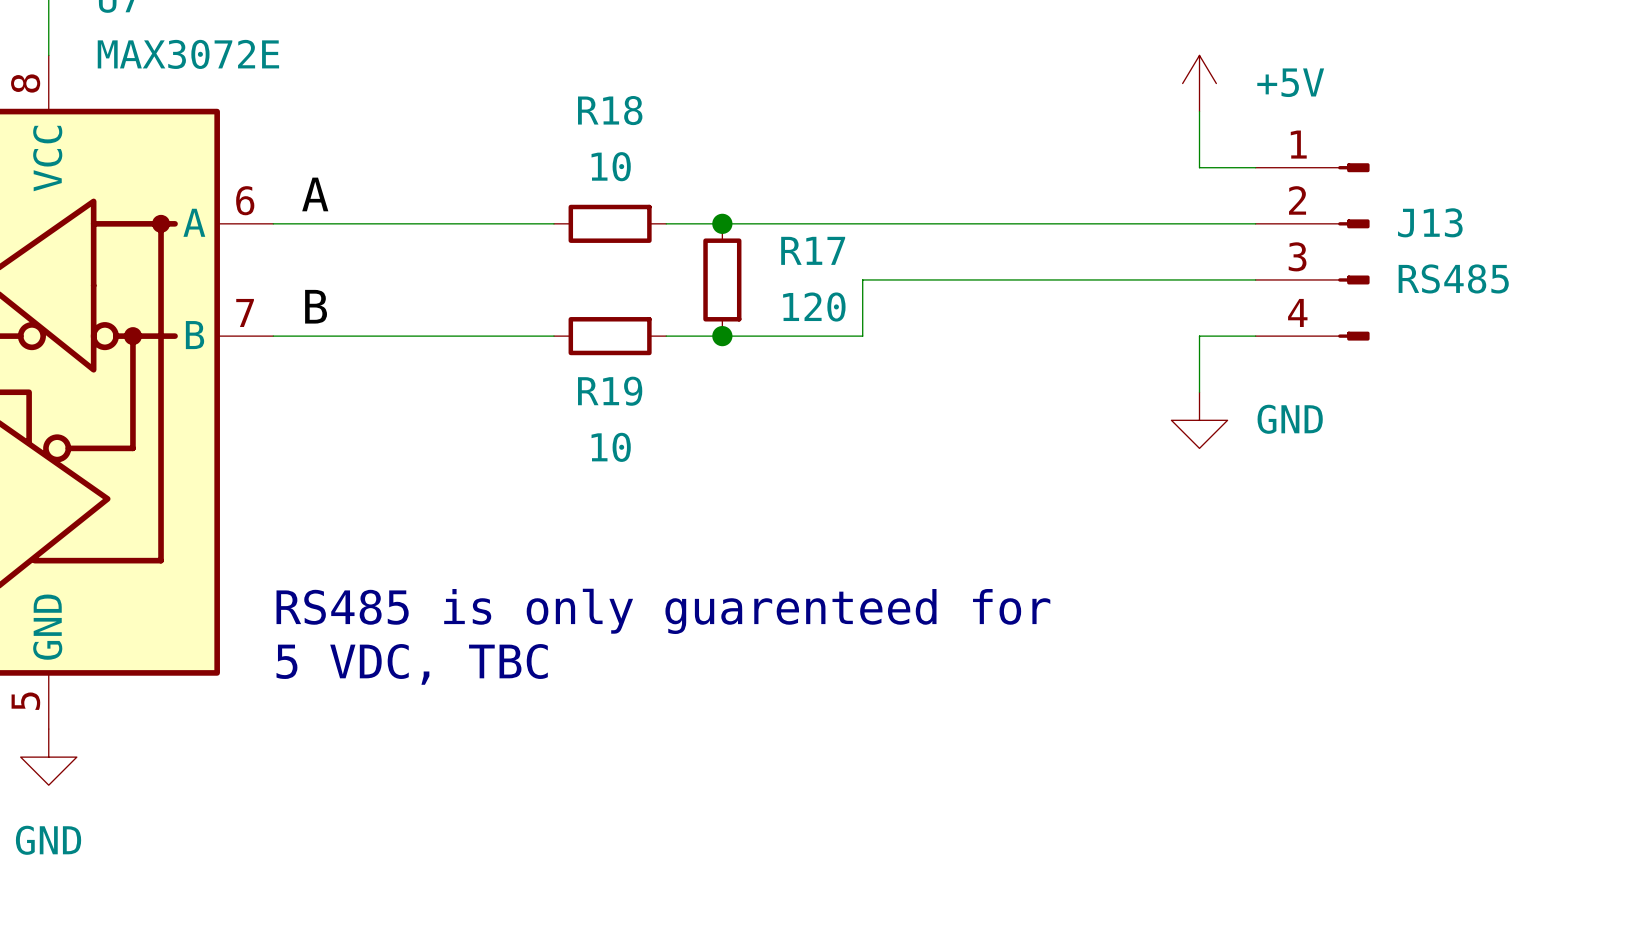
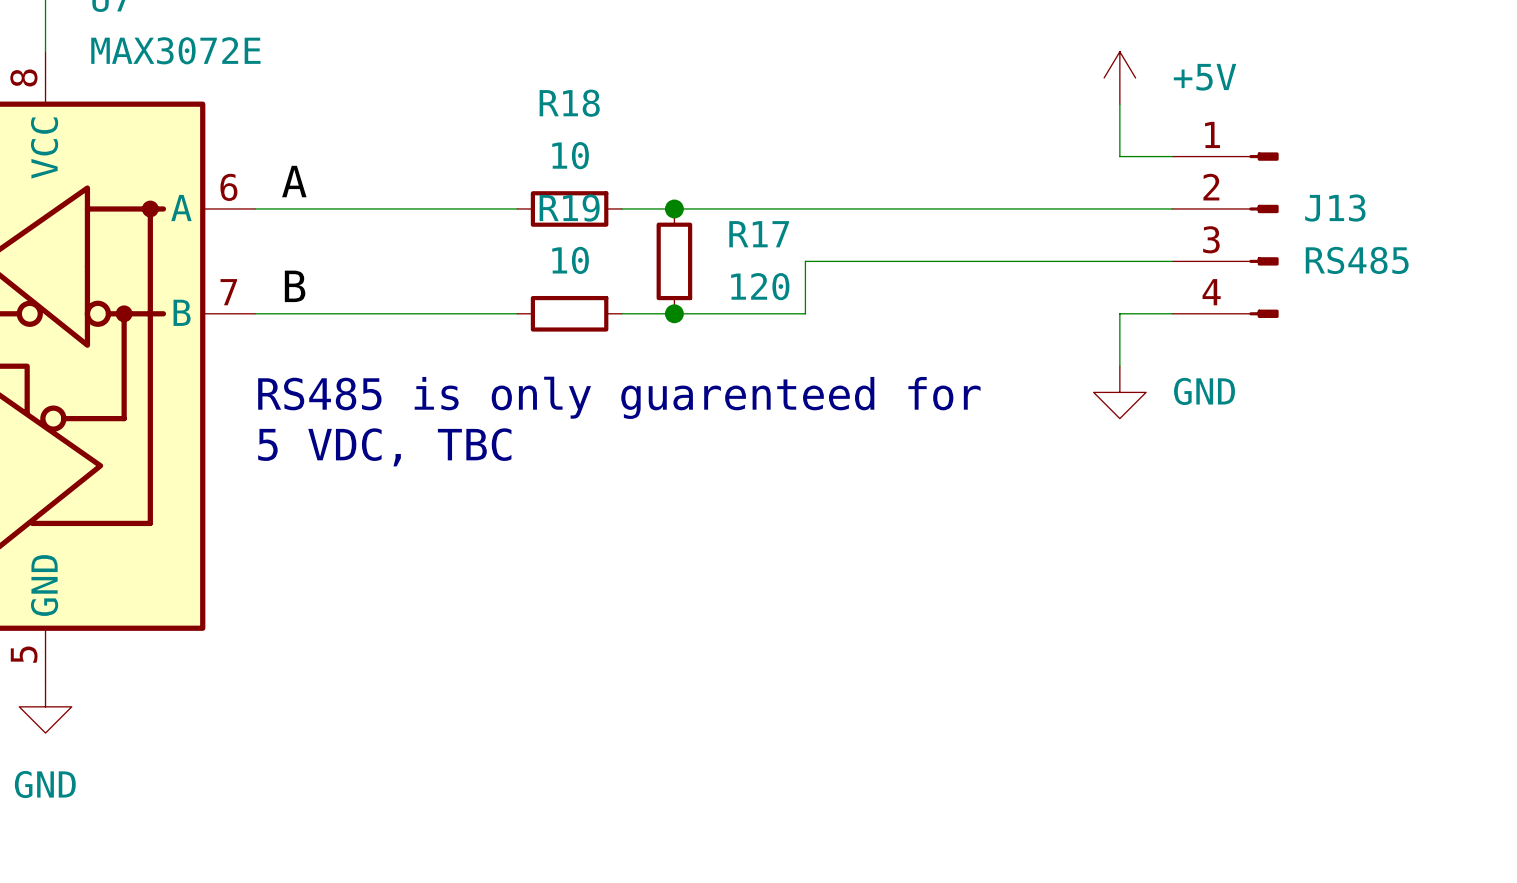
R19 name position: R19 (610, 391) -> R19 (569, 208)
R19 value position: 10 (611, 447) -> 10 (570, 260)
text position: RS485 is only guarenteed for (663, 611) -> RS485 is only guarenteed for (619, 397)
text position: 5 VDC, TBC (412, 664) -> 5 VDC, TBC (384, 447)

